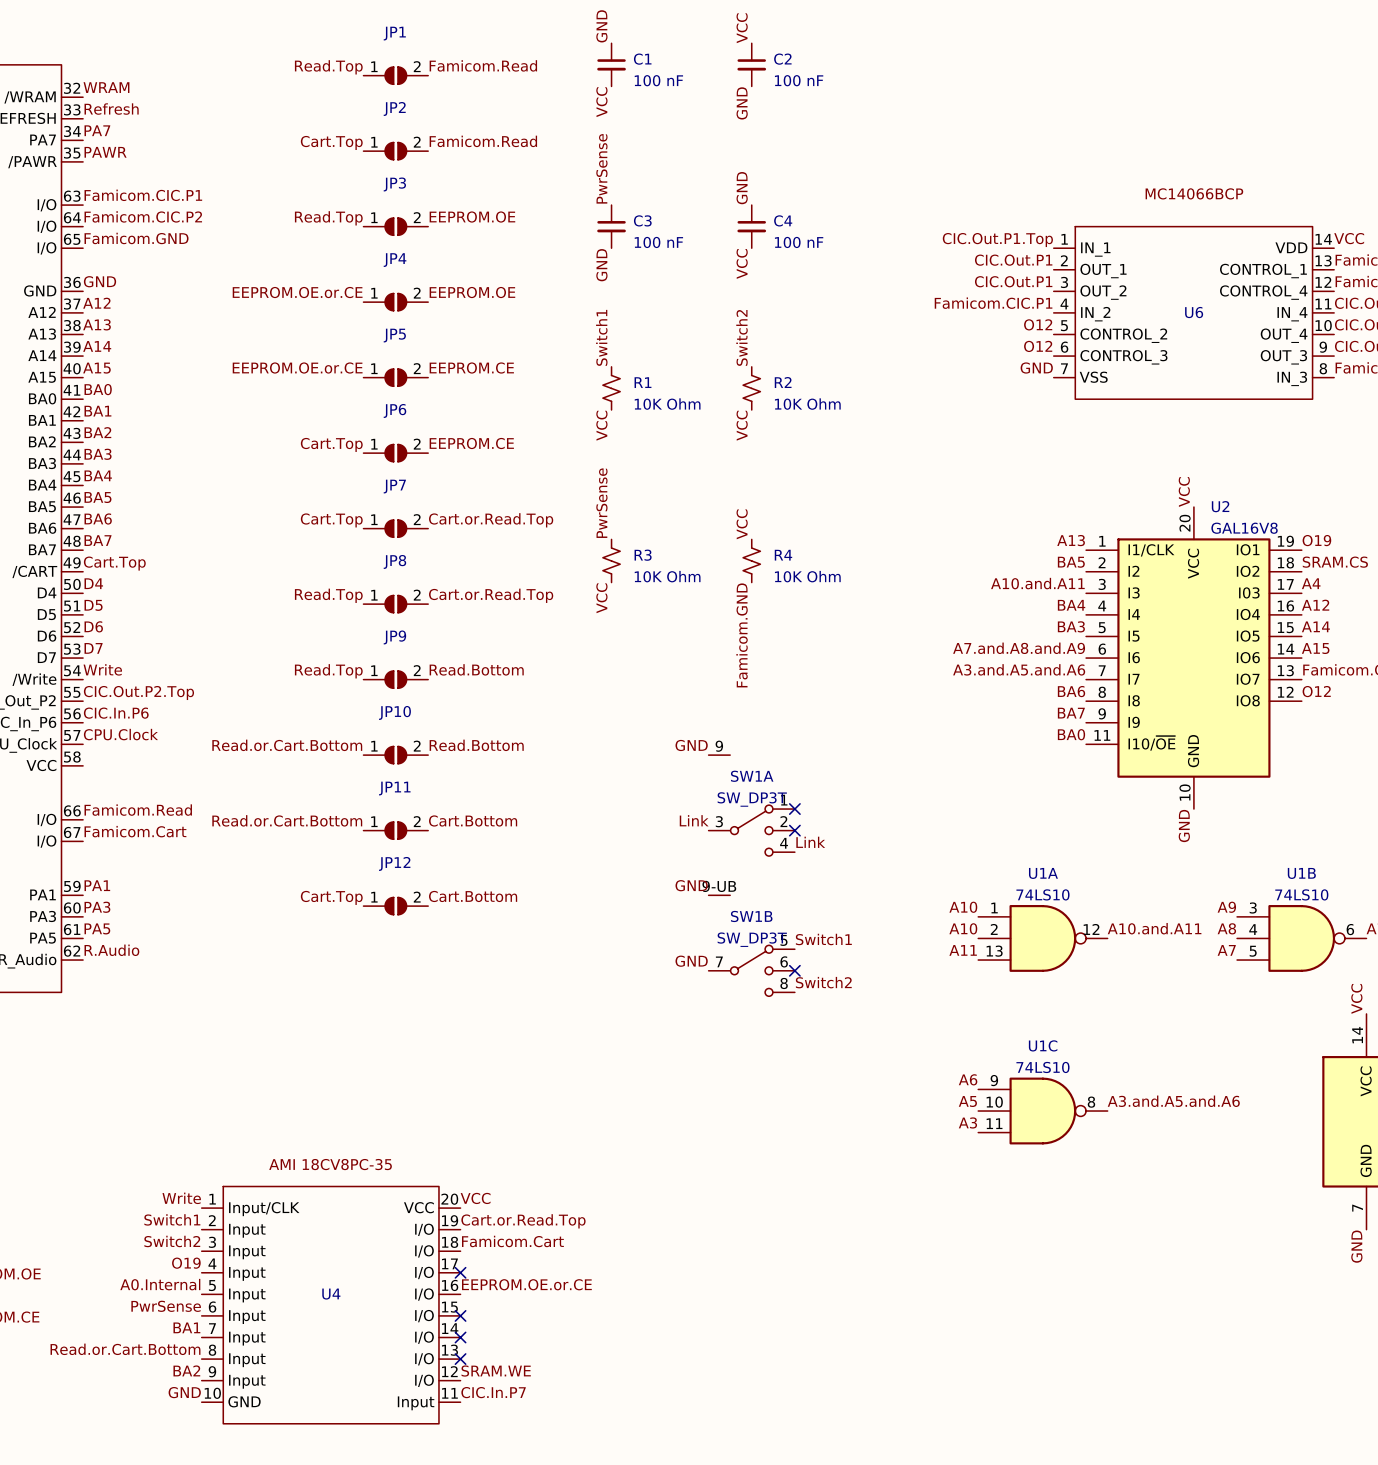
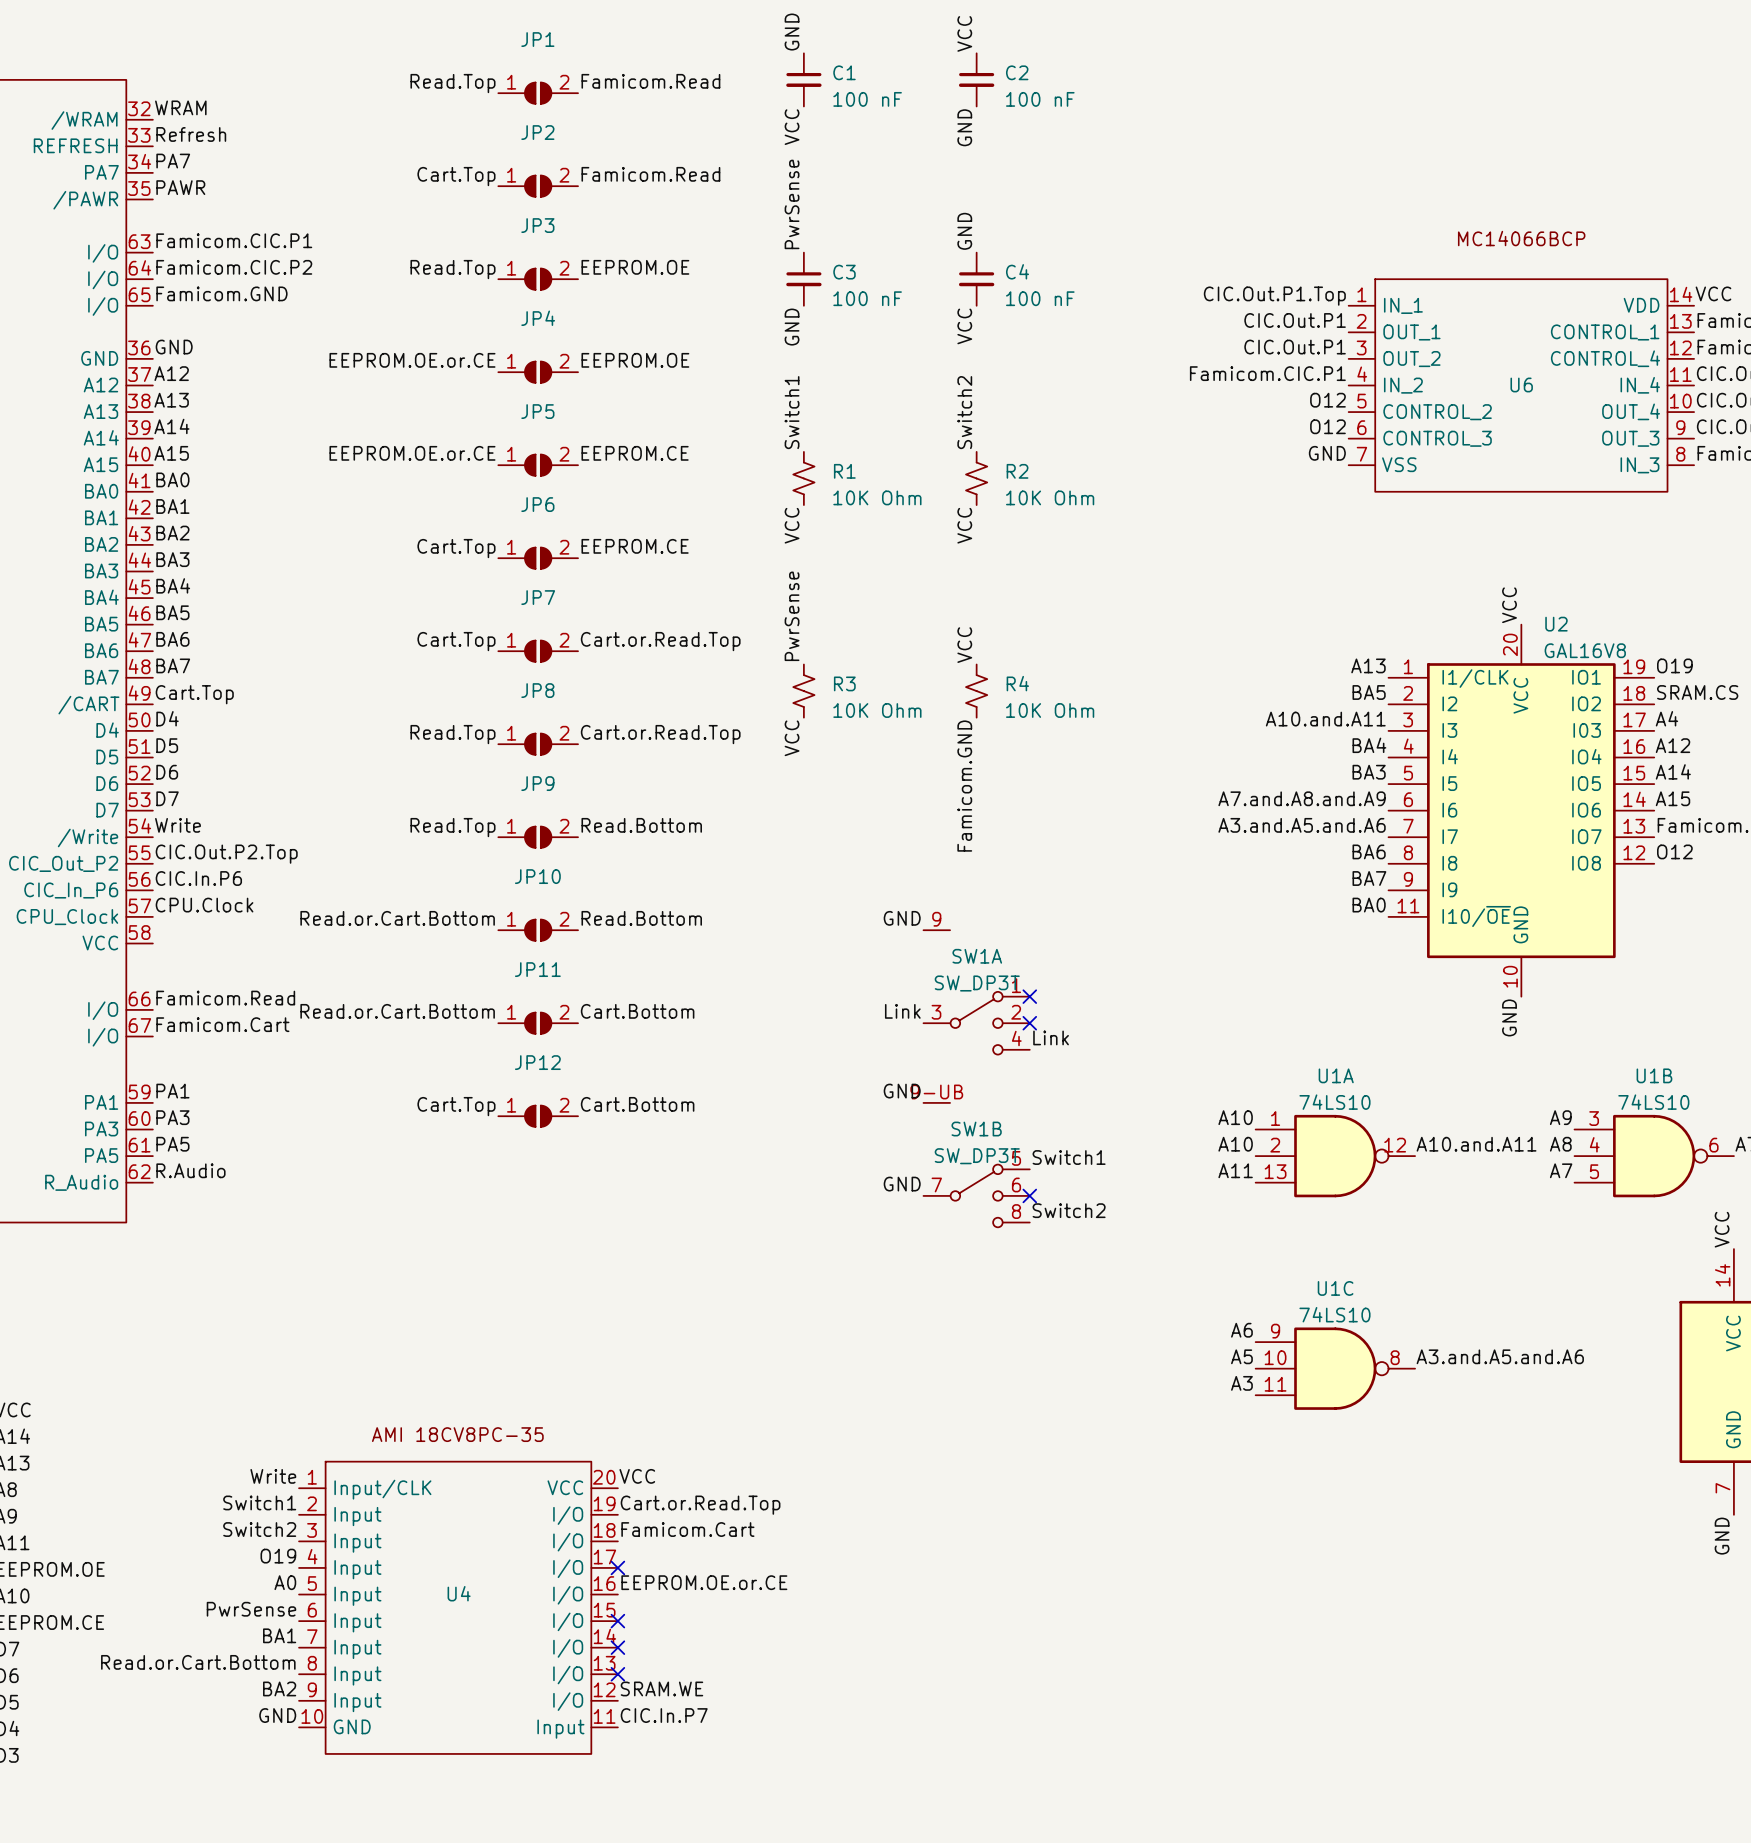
label: A0.Internal (160, 1284) -> A0 (285, 1582)

